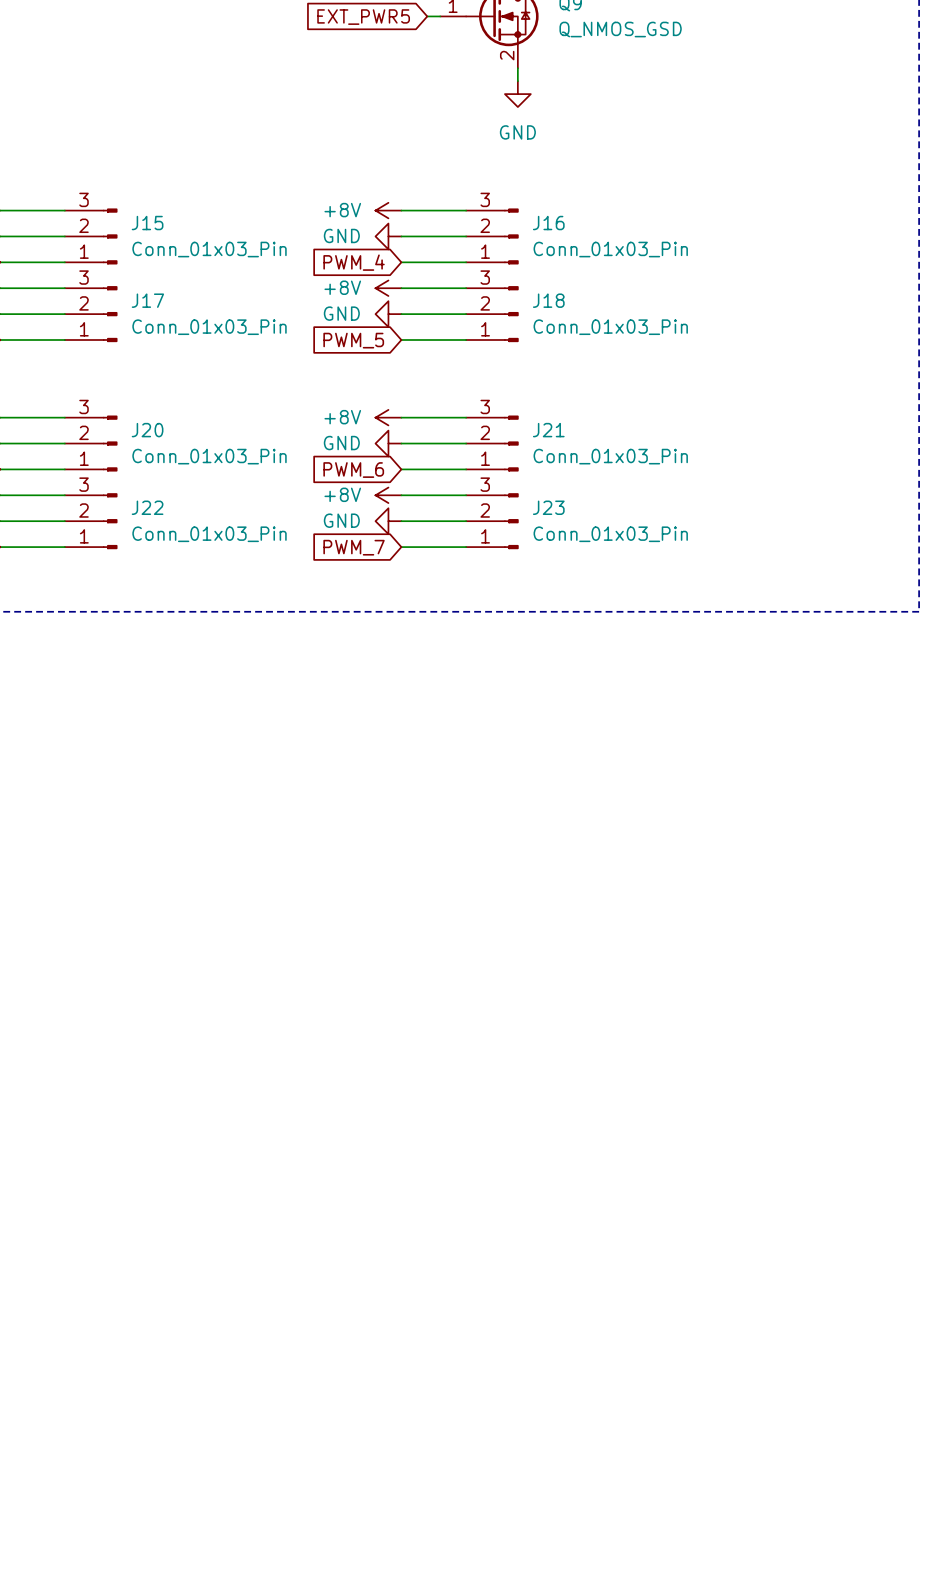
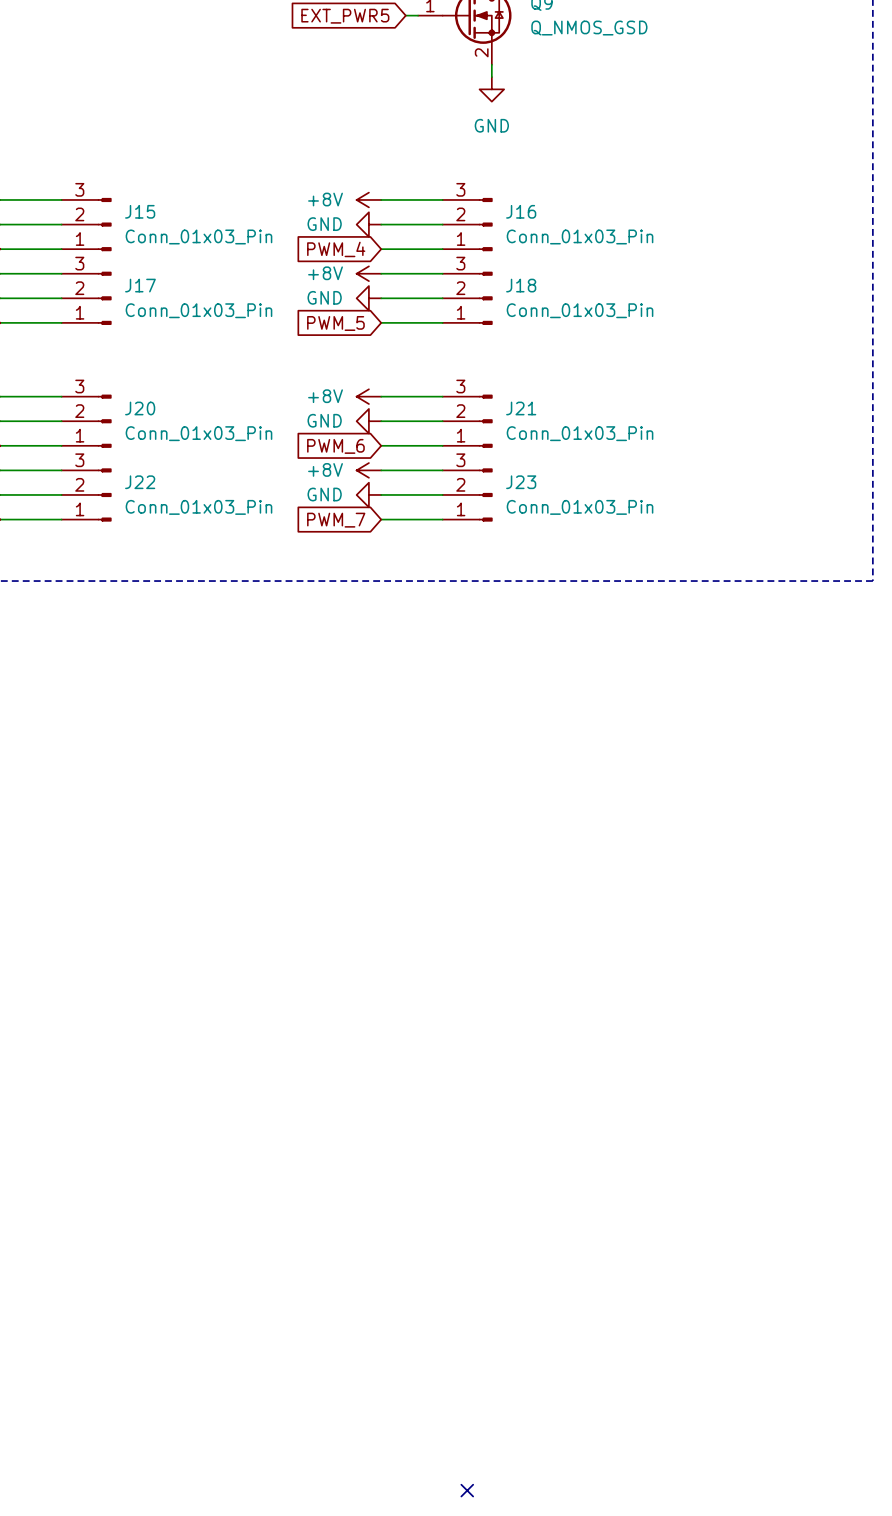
no-connect mark: none -> (467, 1490)

